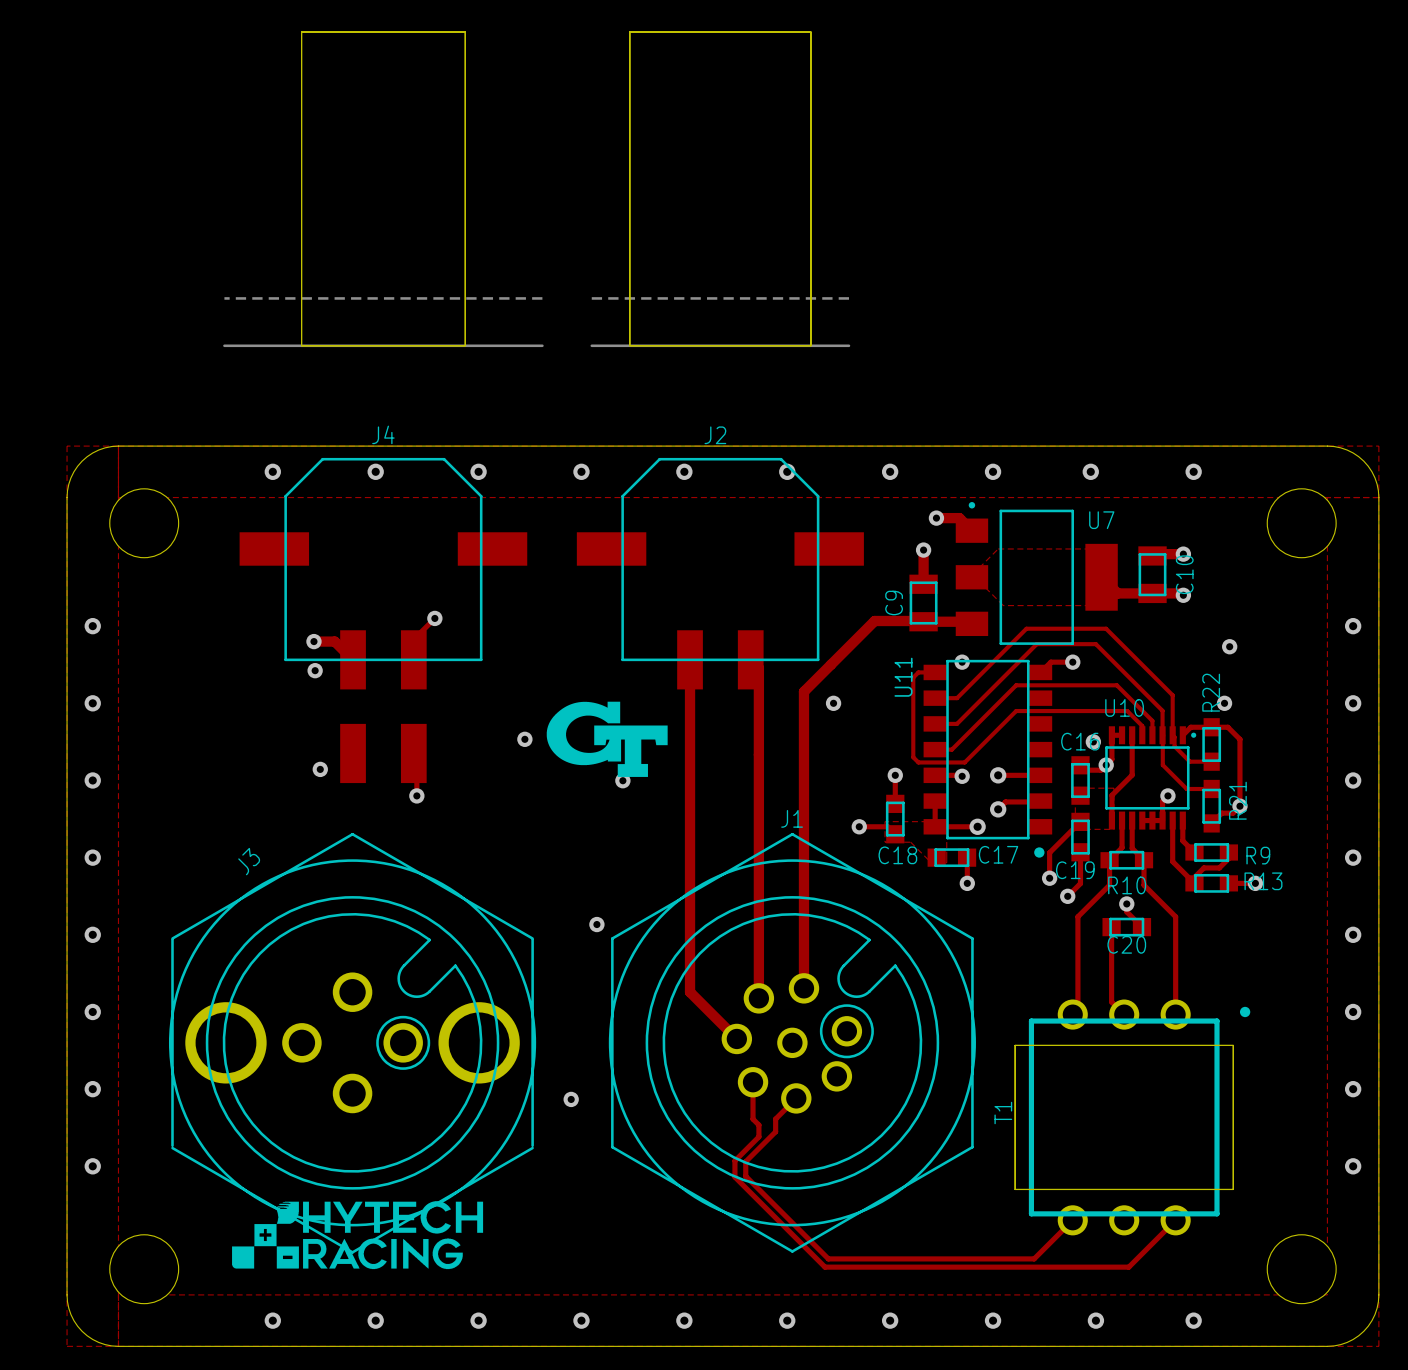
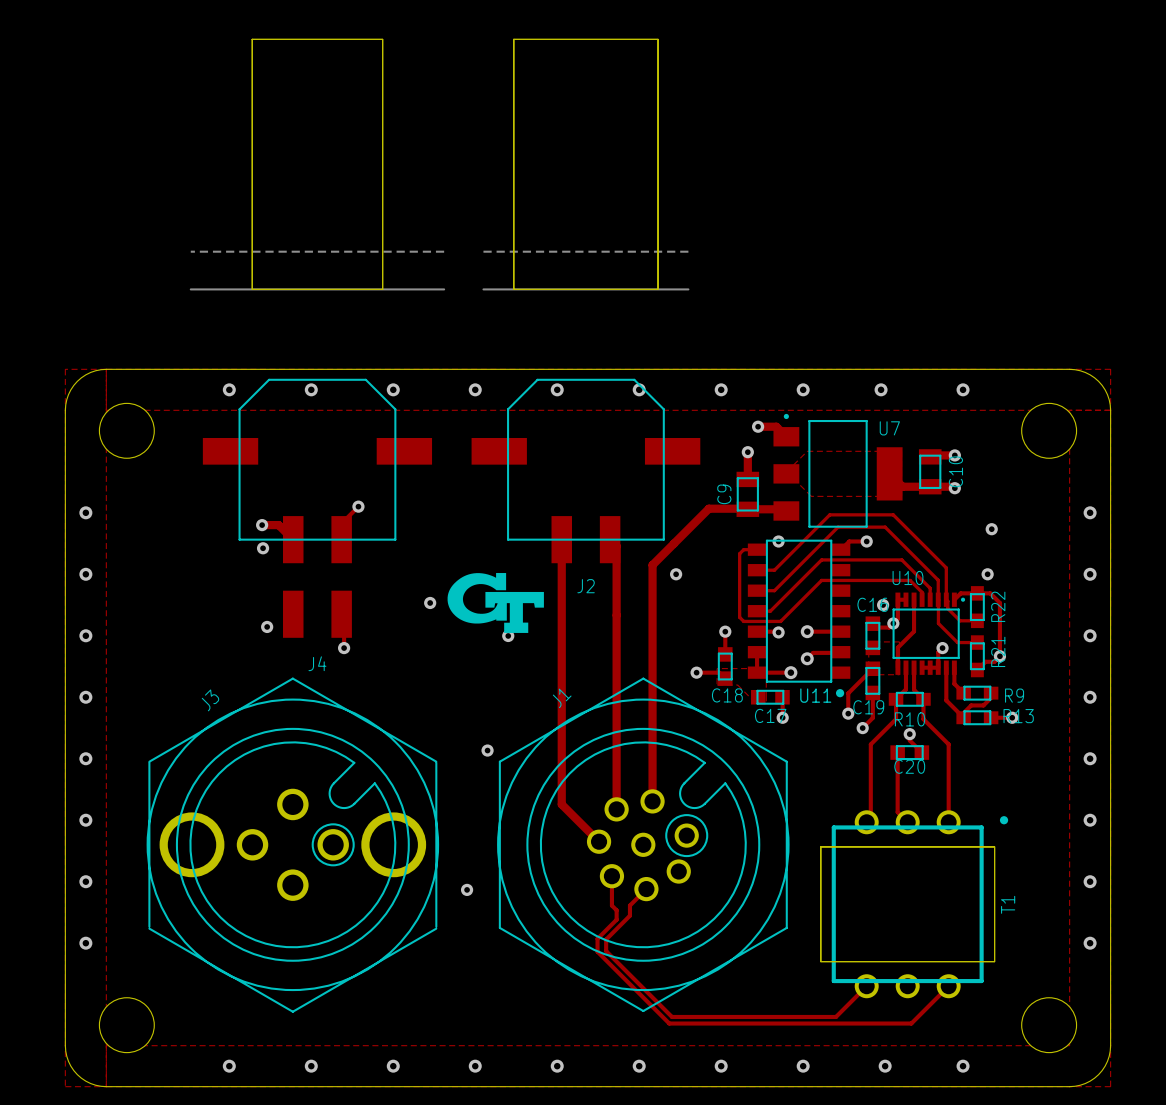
J4 name position: J4 (383, 434) -> J4 (317, 663)
J2 name position: J2 (715, 435) -> J2 (586, 586)
U11 name rotation: 0° (903, 677) -> 90° clockwise (815, 695)
U11 name position: U11 (903, 677) -> U11 (815, 695)
R22 name position: R22 (1211, 692) -> R22 (998, 606)
J1 name rotation: 0° (792, 818) -> 45° counterclockwise (562, 698)
J1 name position: J1 (792, 818) -> J1 (562, 698)
C17 name position: C17 (998, 854) -> C17 (770, 715)
T1 name position: T1 (1003, 1113) -> T1 (1008, 904)
drawing: [232, 1201, 484, 1270] -> none

